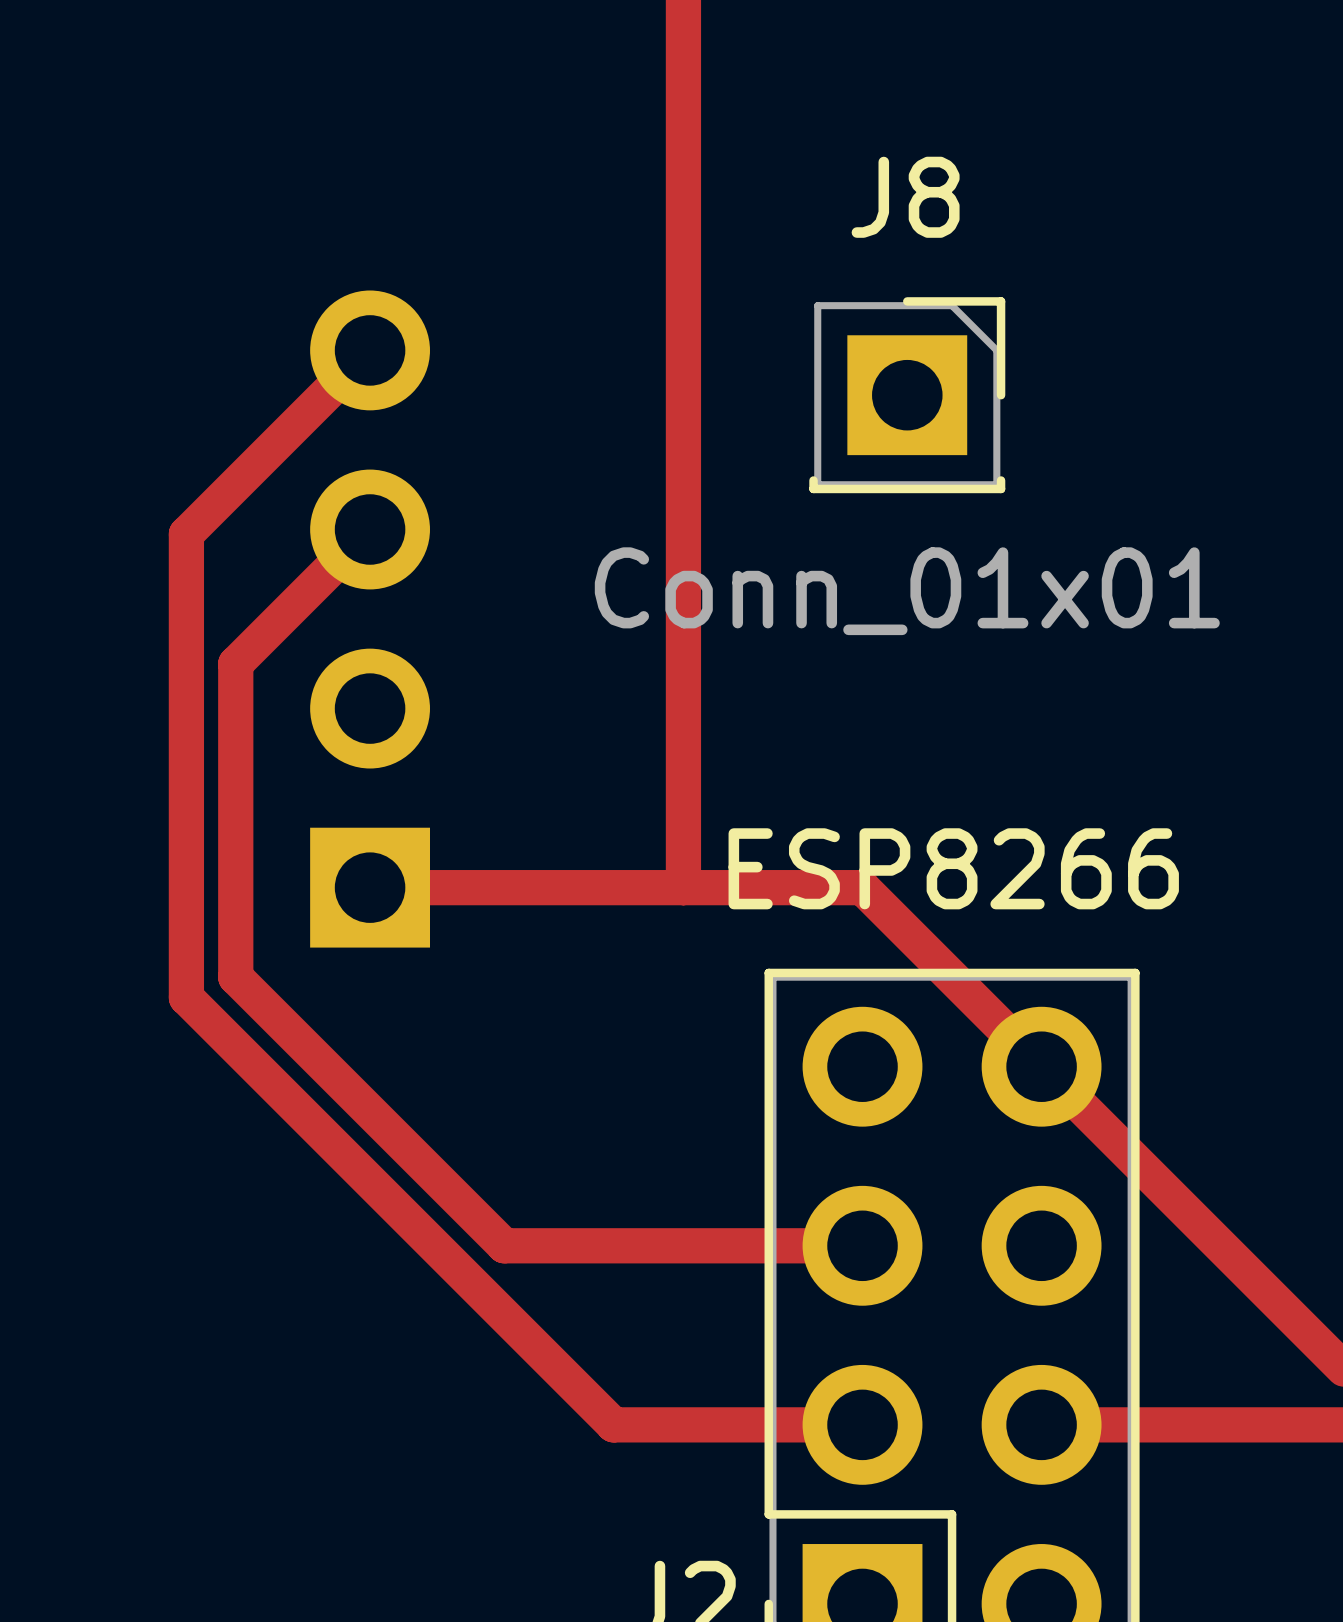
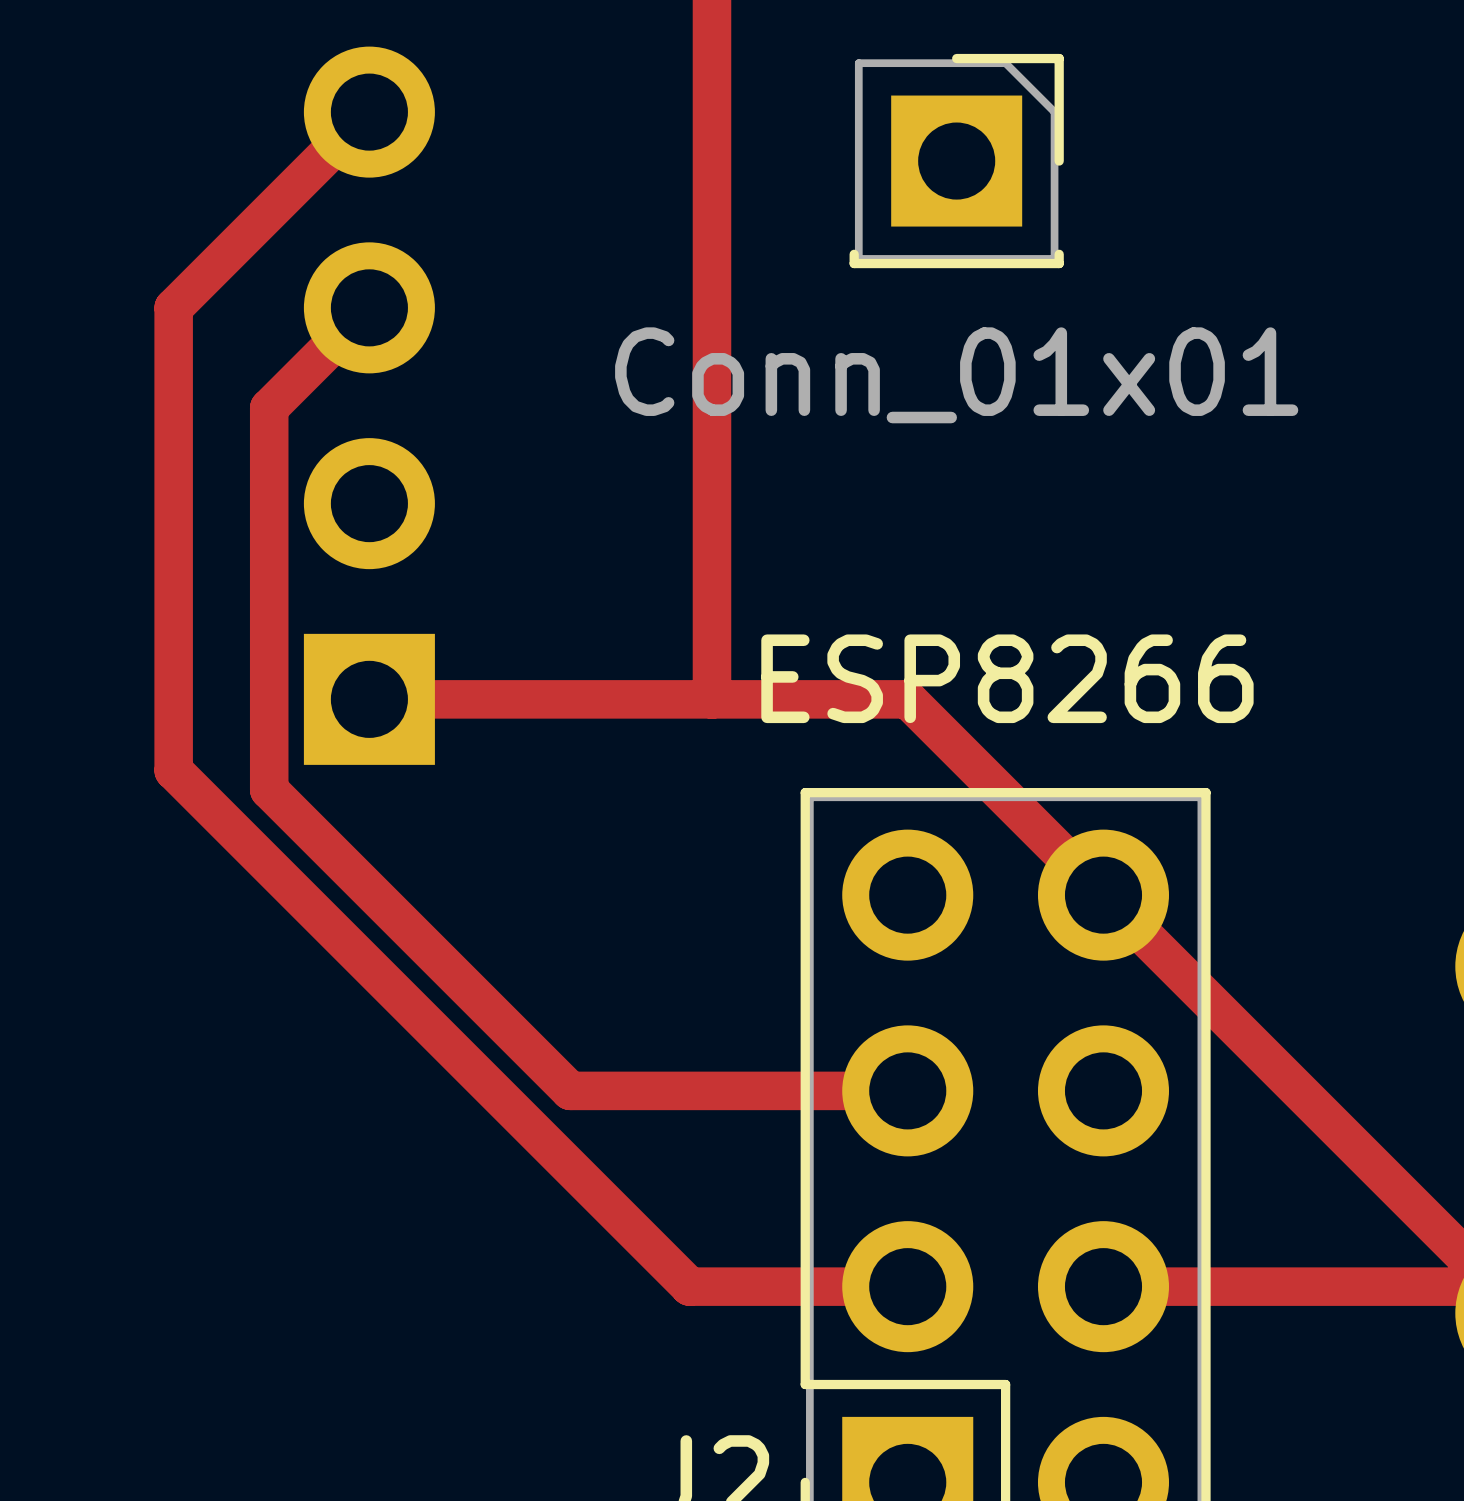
track: (190, 529) (186, 534) (186, 997) (613, 1424) (663, 1424) -> (173, 307) (173, 770) (689, 1286)
track: (278, 621) (235, 663) (235, 977) (504, 1245) (553, 1245) -> (269, 408) (269, 789) (570, 1090)

